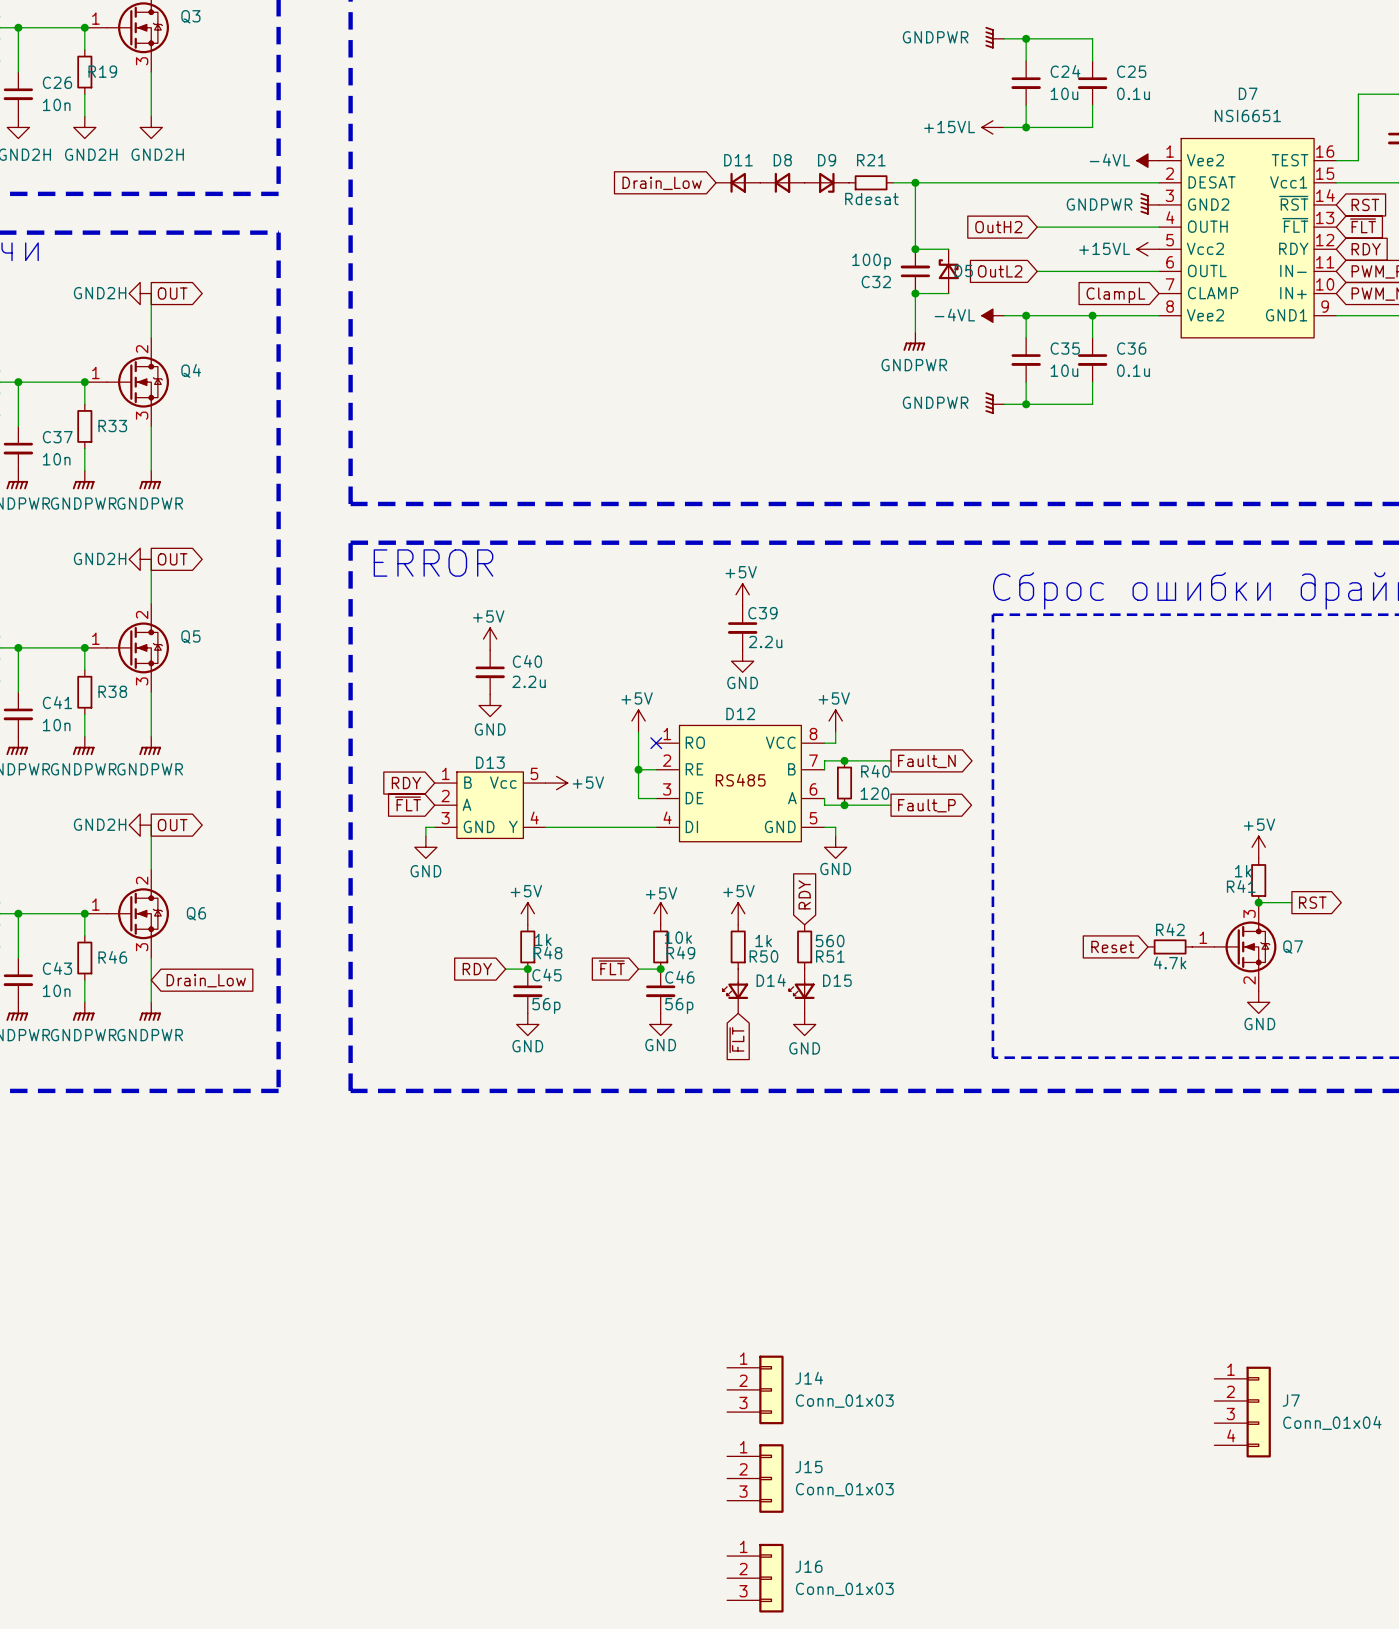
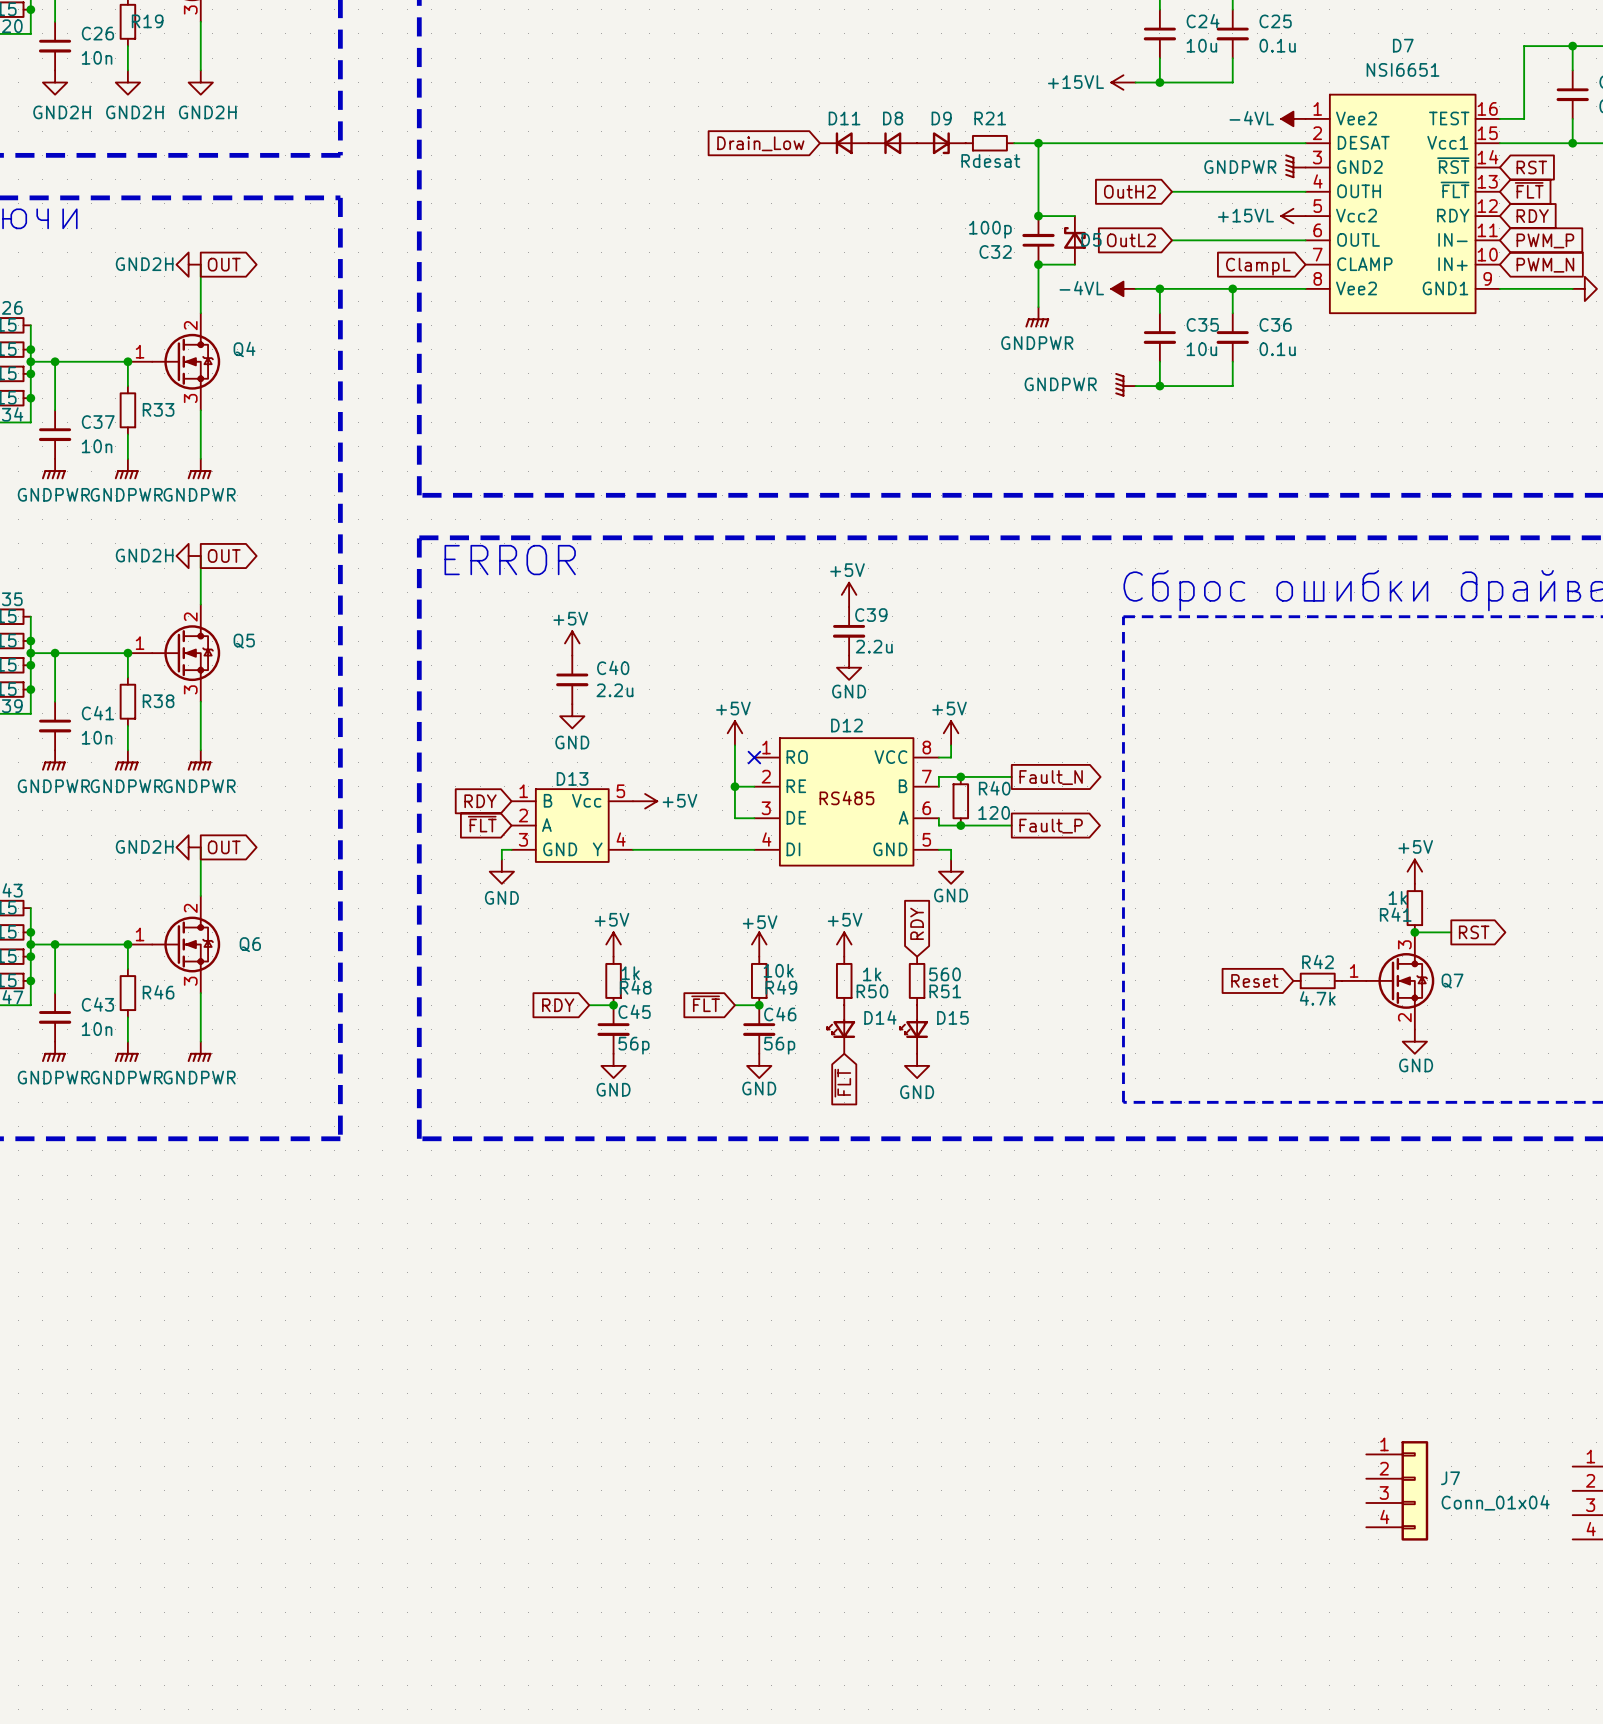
global label: Drain_Low (206, 980) -> none
J14: Conn_01x03 (755, 1389) -> none
J15: Conn_01x03 (755, 1478) -> none
J16: Conn_01x03 (755, 1578) -> none

